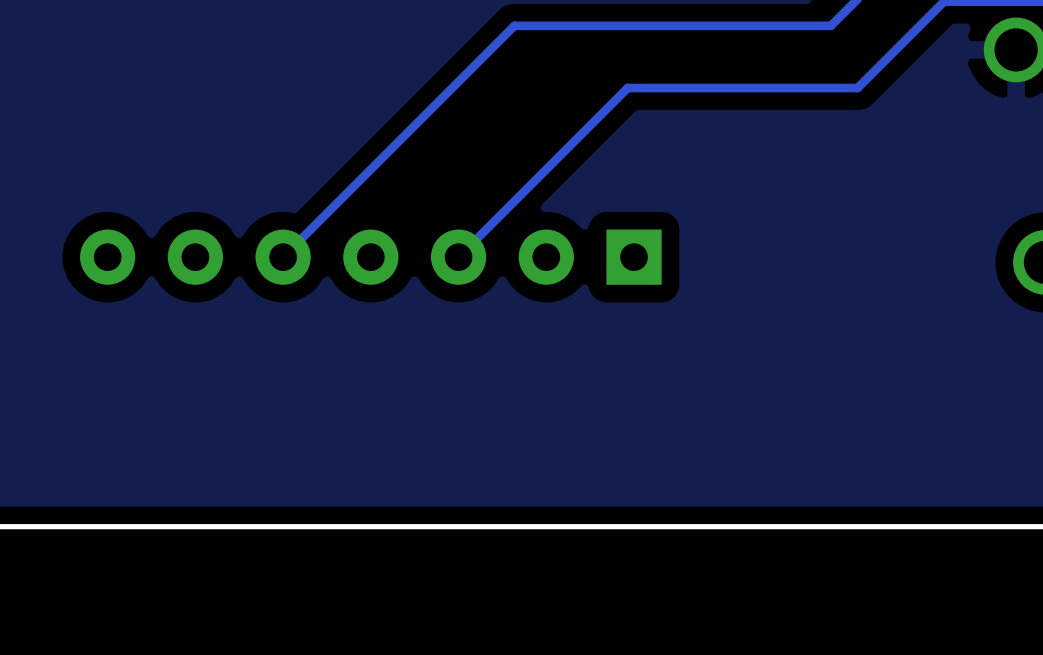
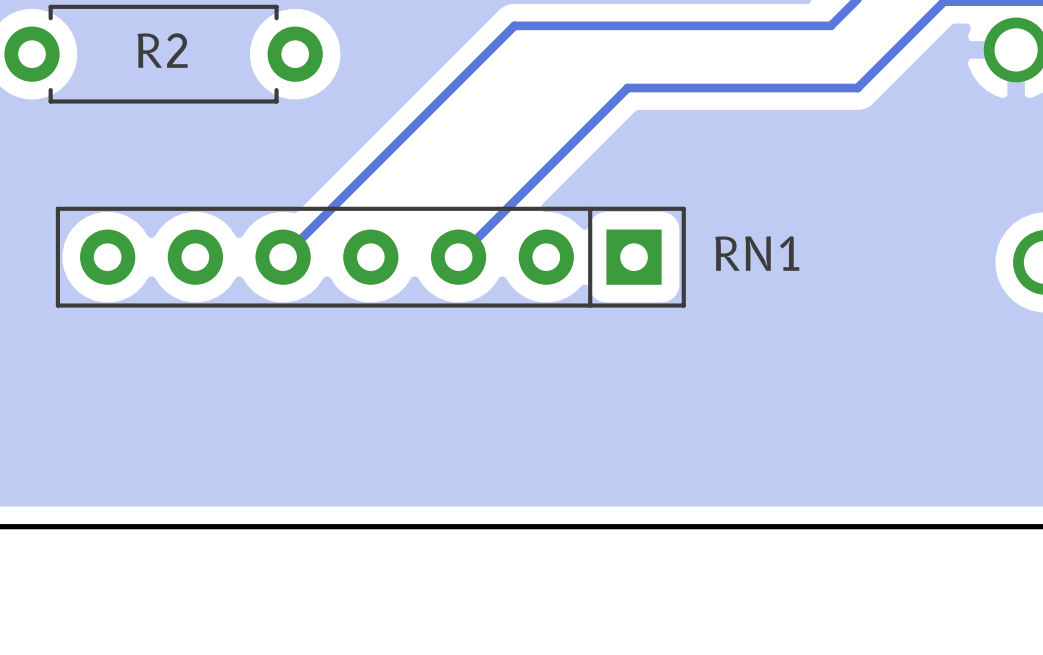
R2: none -> (163, 54)
RN1 side: top (370, 257) -> bottom (370, 257)

